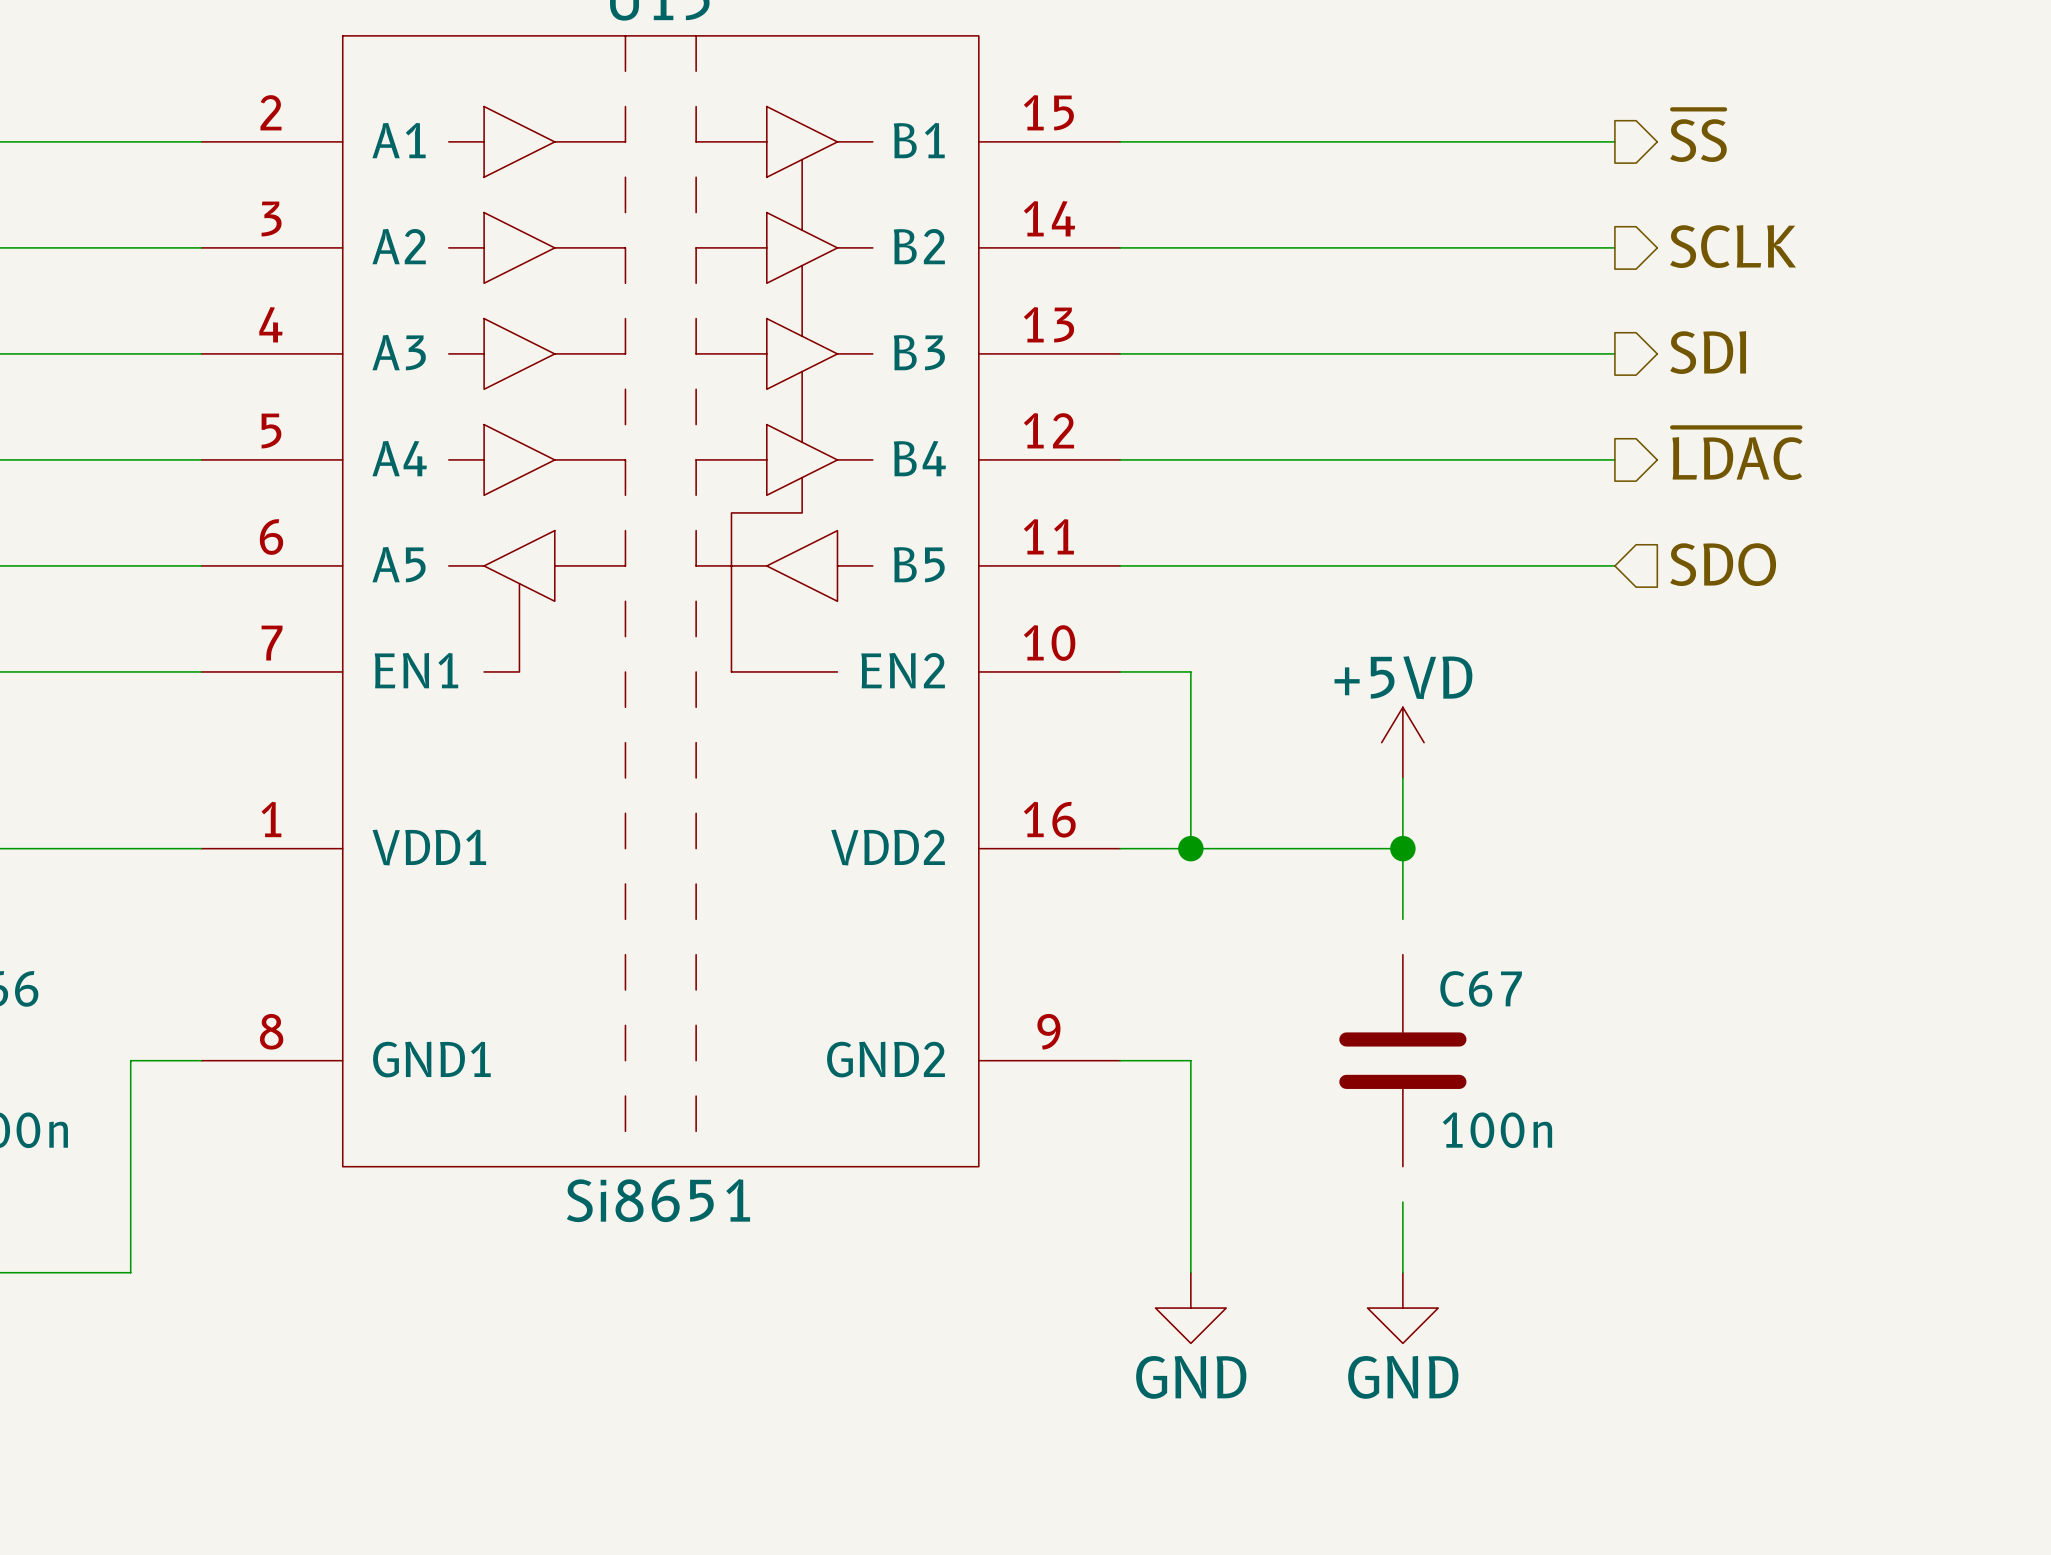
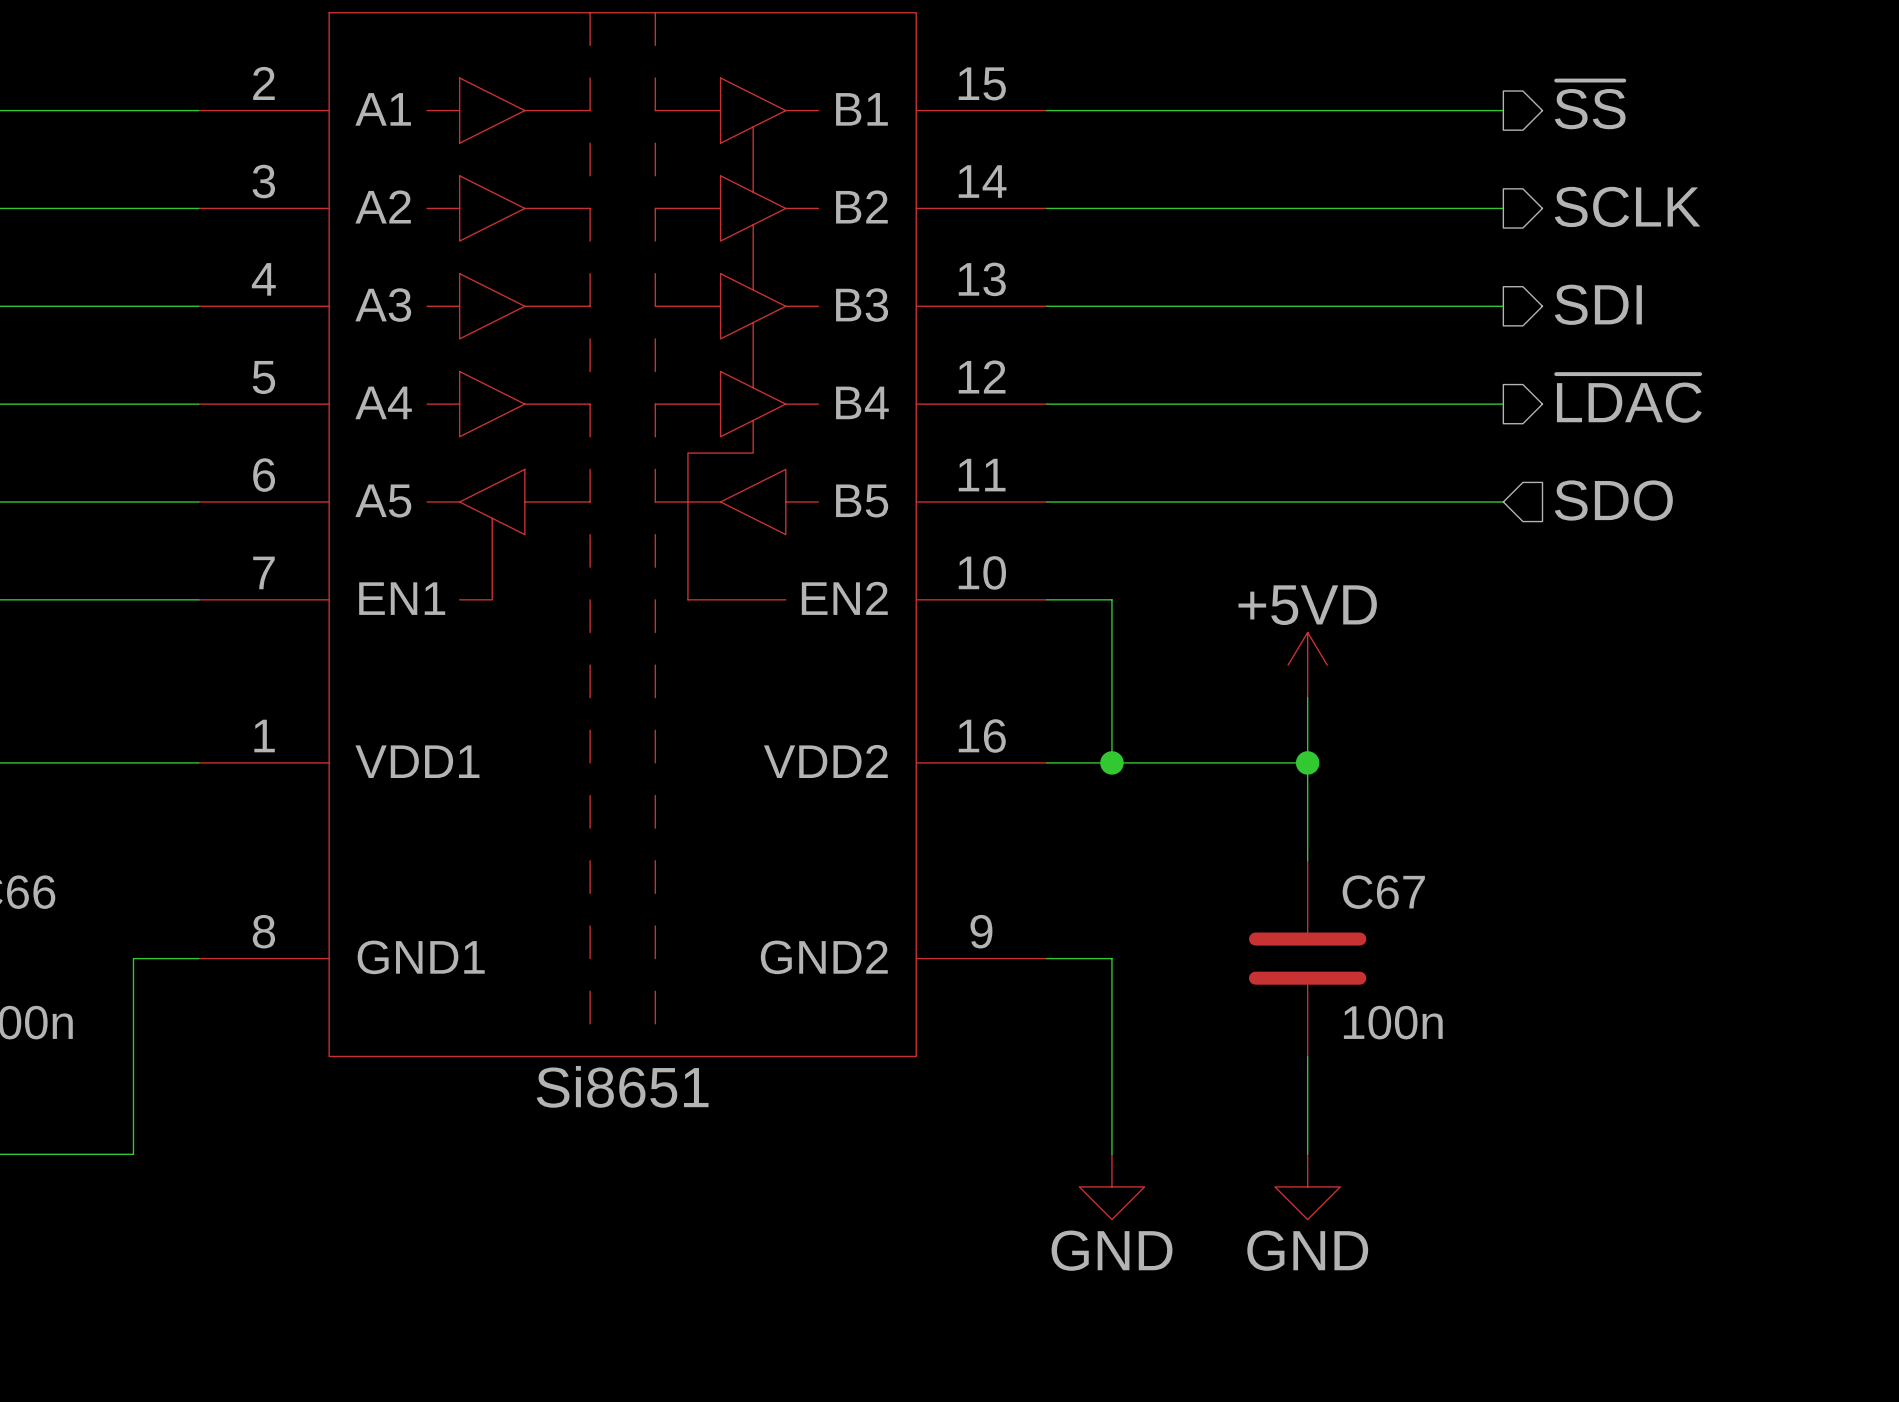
wire: none -> (1307, 828) (1307, 860)
wire: none -> (1307, 1056) (1307, 1089)

